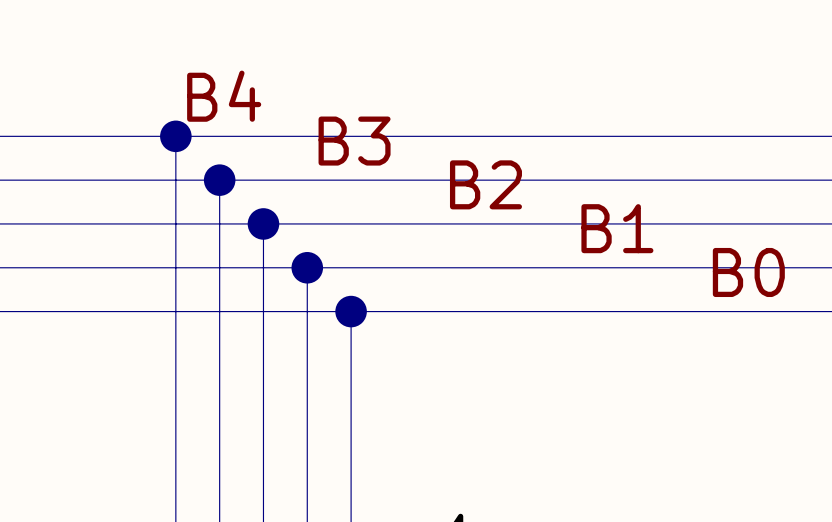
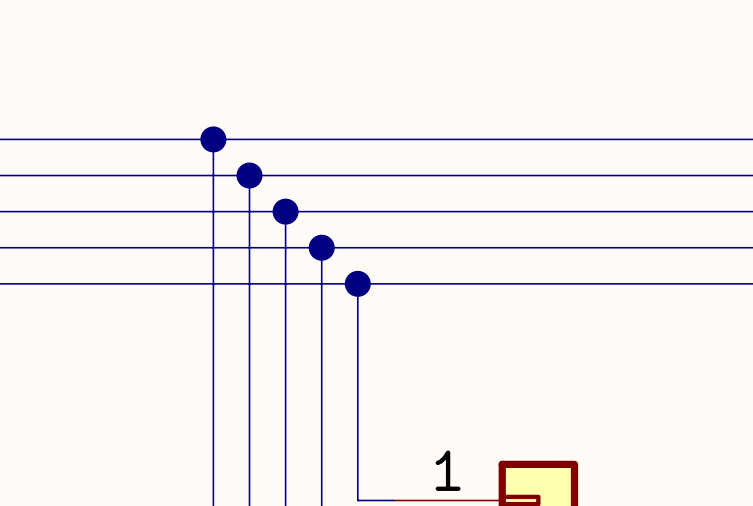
label: B4 (224, 96) -> none
label: B3 (354, 141) -> none
label: B2 (485, 184) -> none
label: B1 (617, 228) -> none
label: B0 (748, 272) -> none

